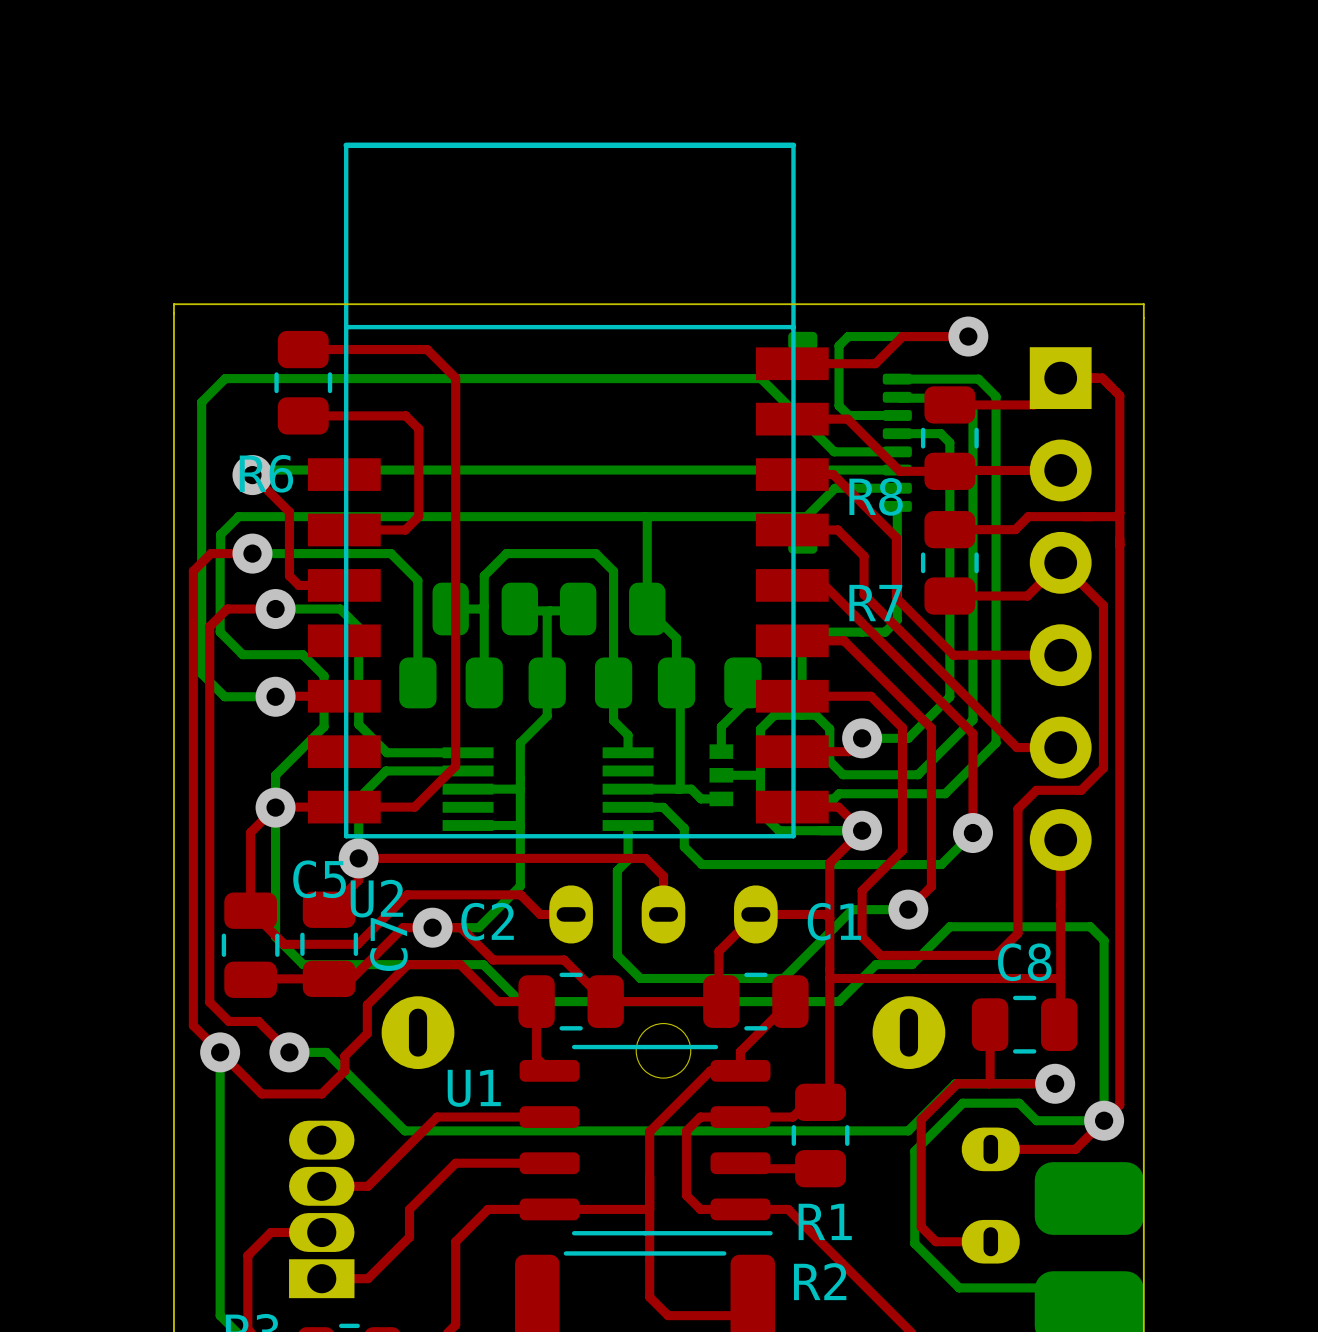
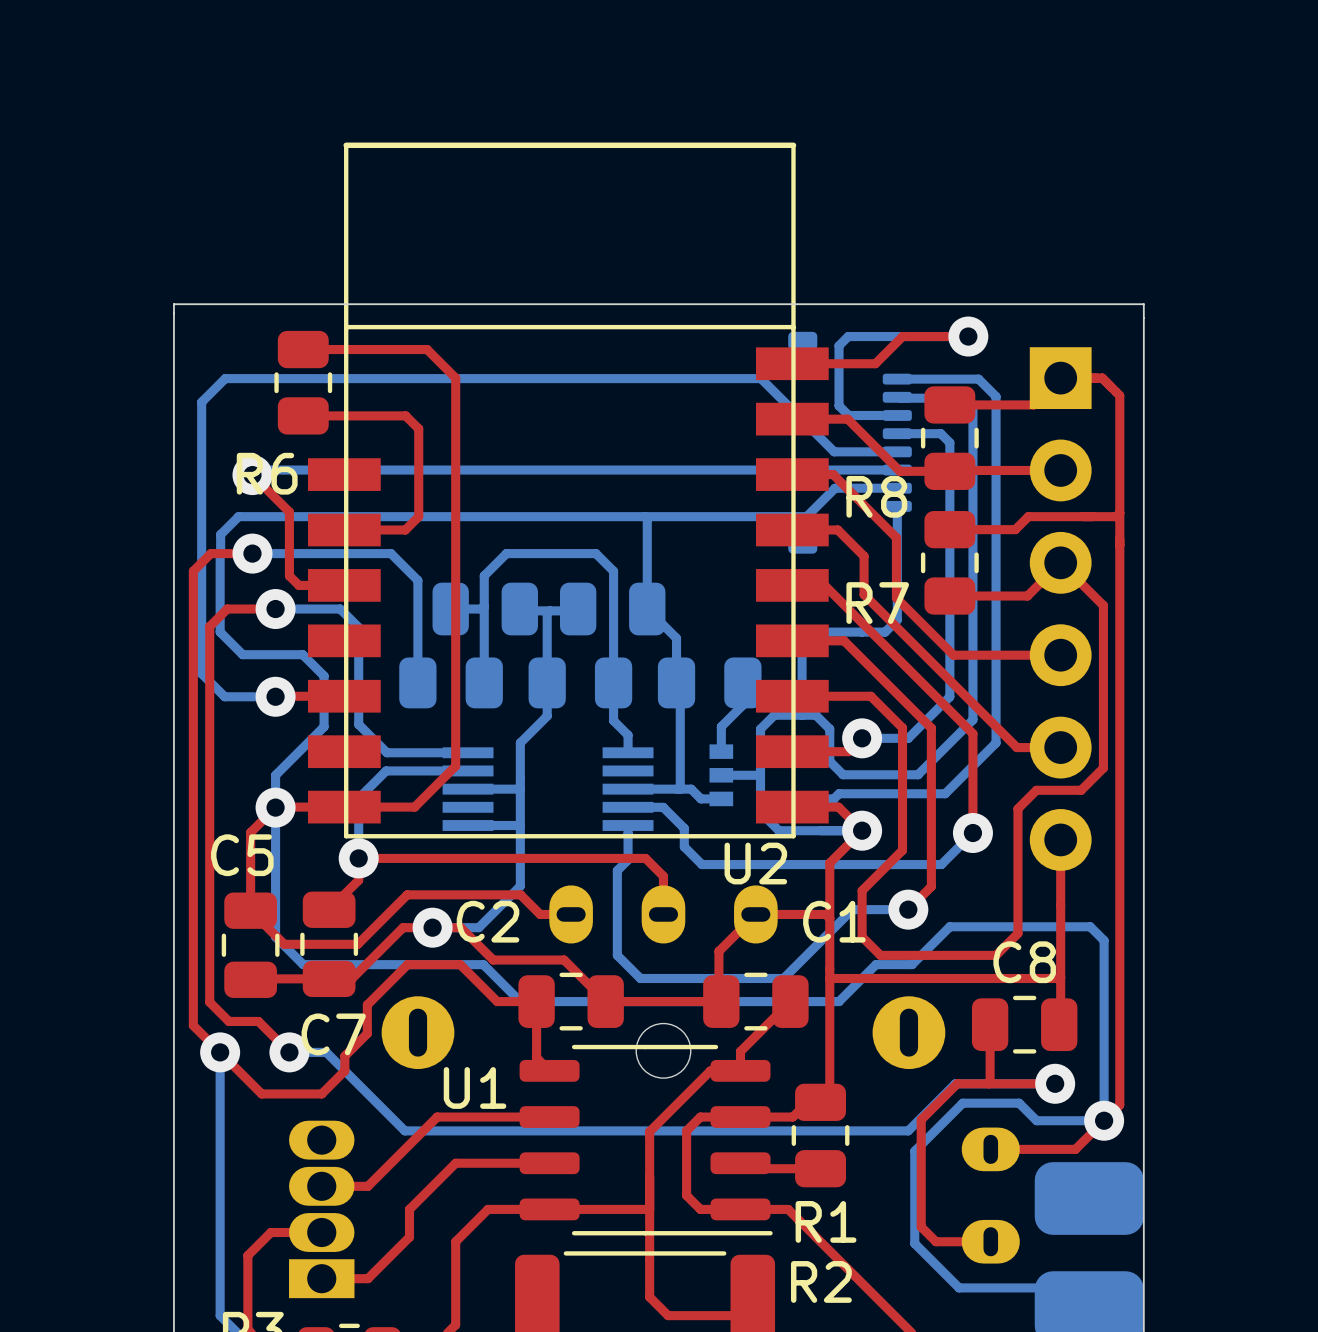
C5 name position: C5 (319, 879) -> C5 (242, 855)
U2 name position: U2 (376, 898) -> U2 (755, 863)
C7 name rotation: 0° (388, 944) -> 90° clockwise (333, 1034)
C7 name position: C7 (388, 944) -> C7 (333, 1034)

